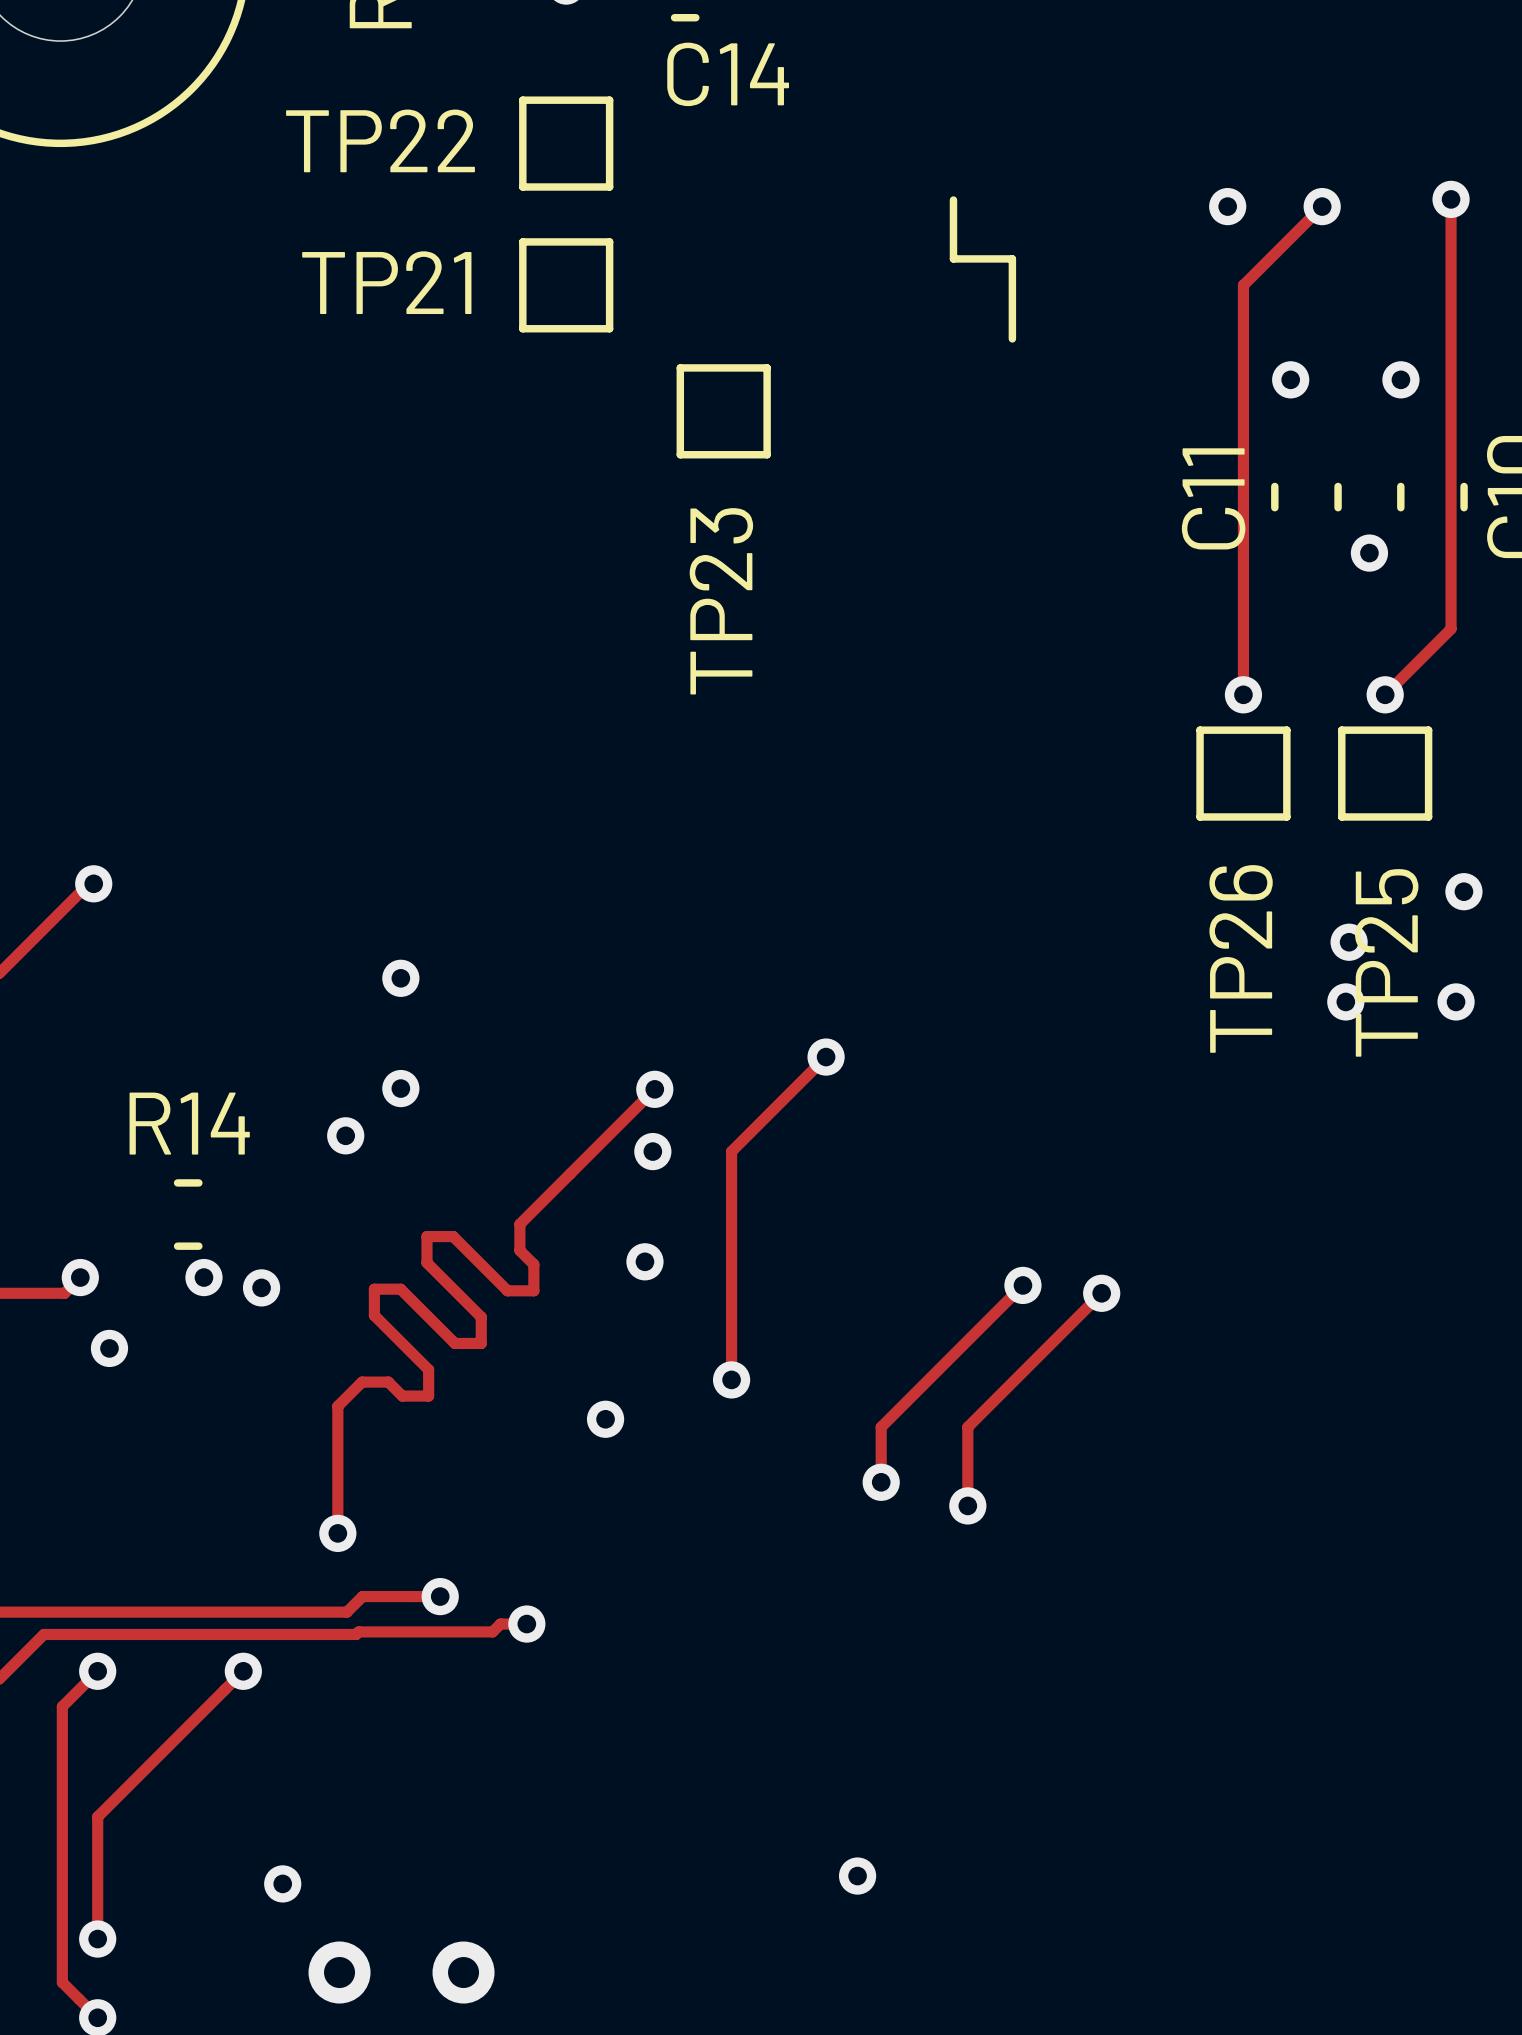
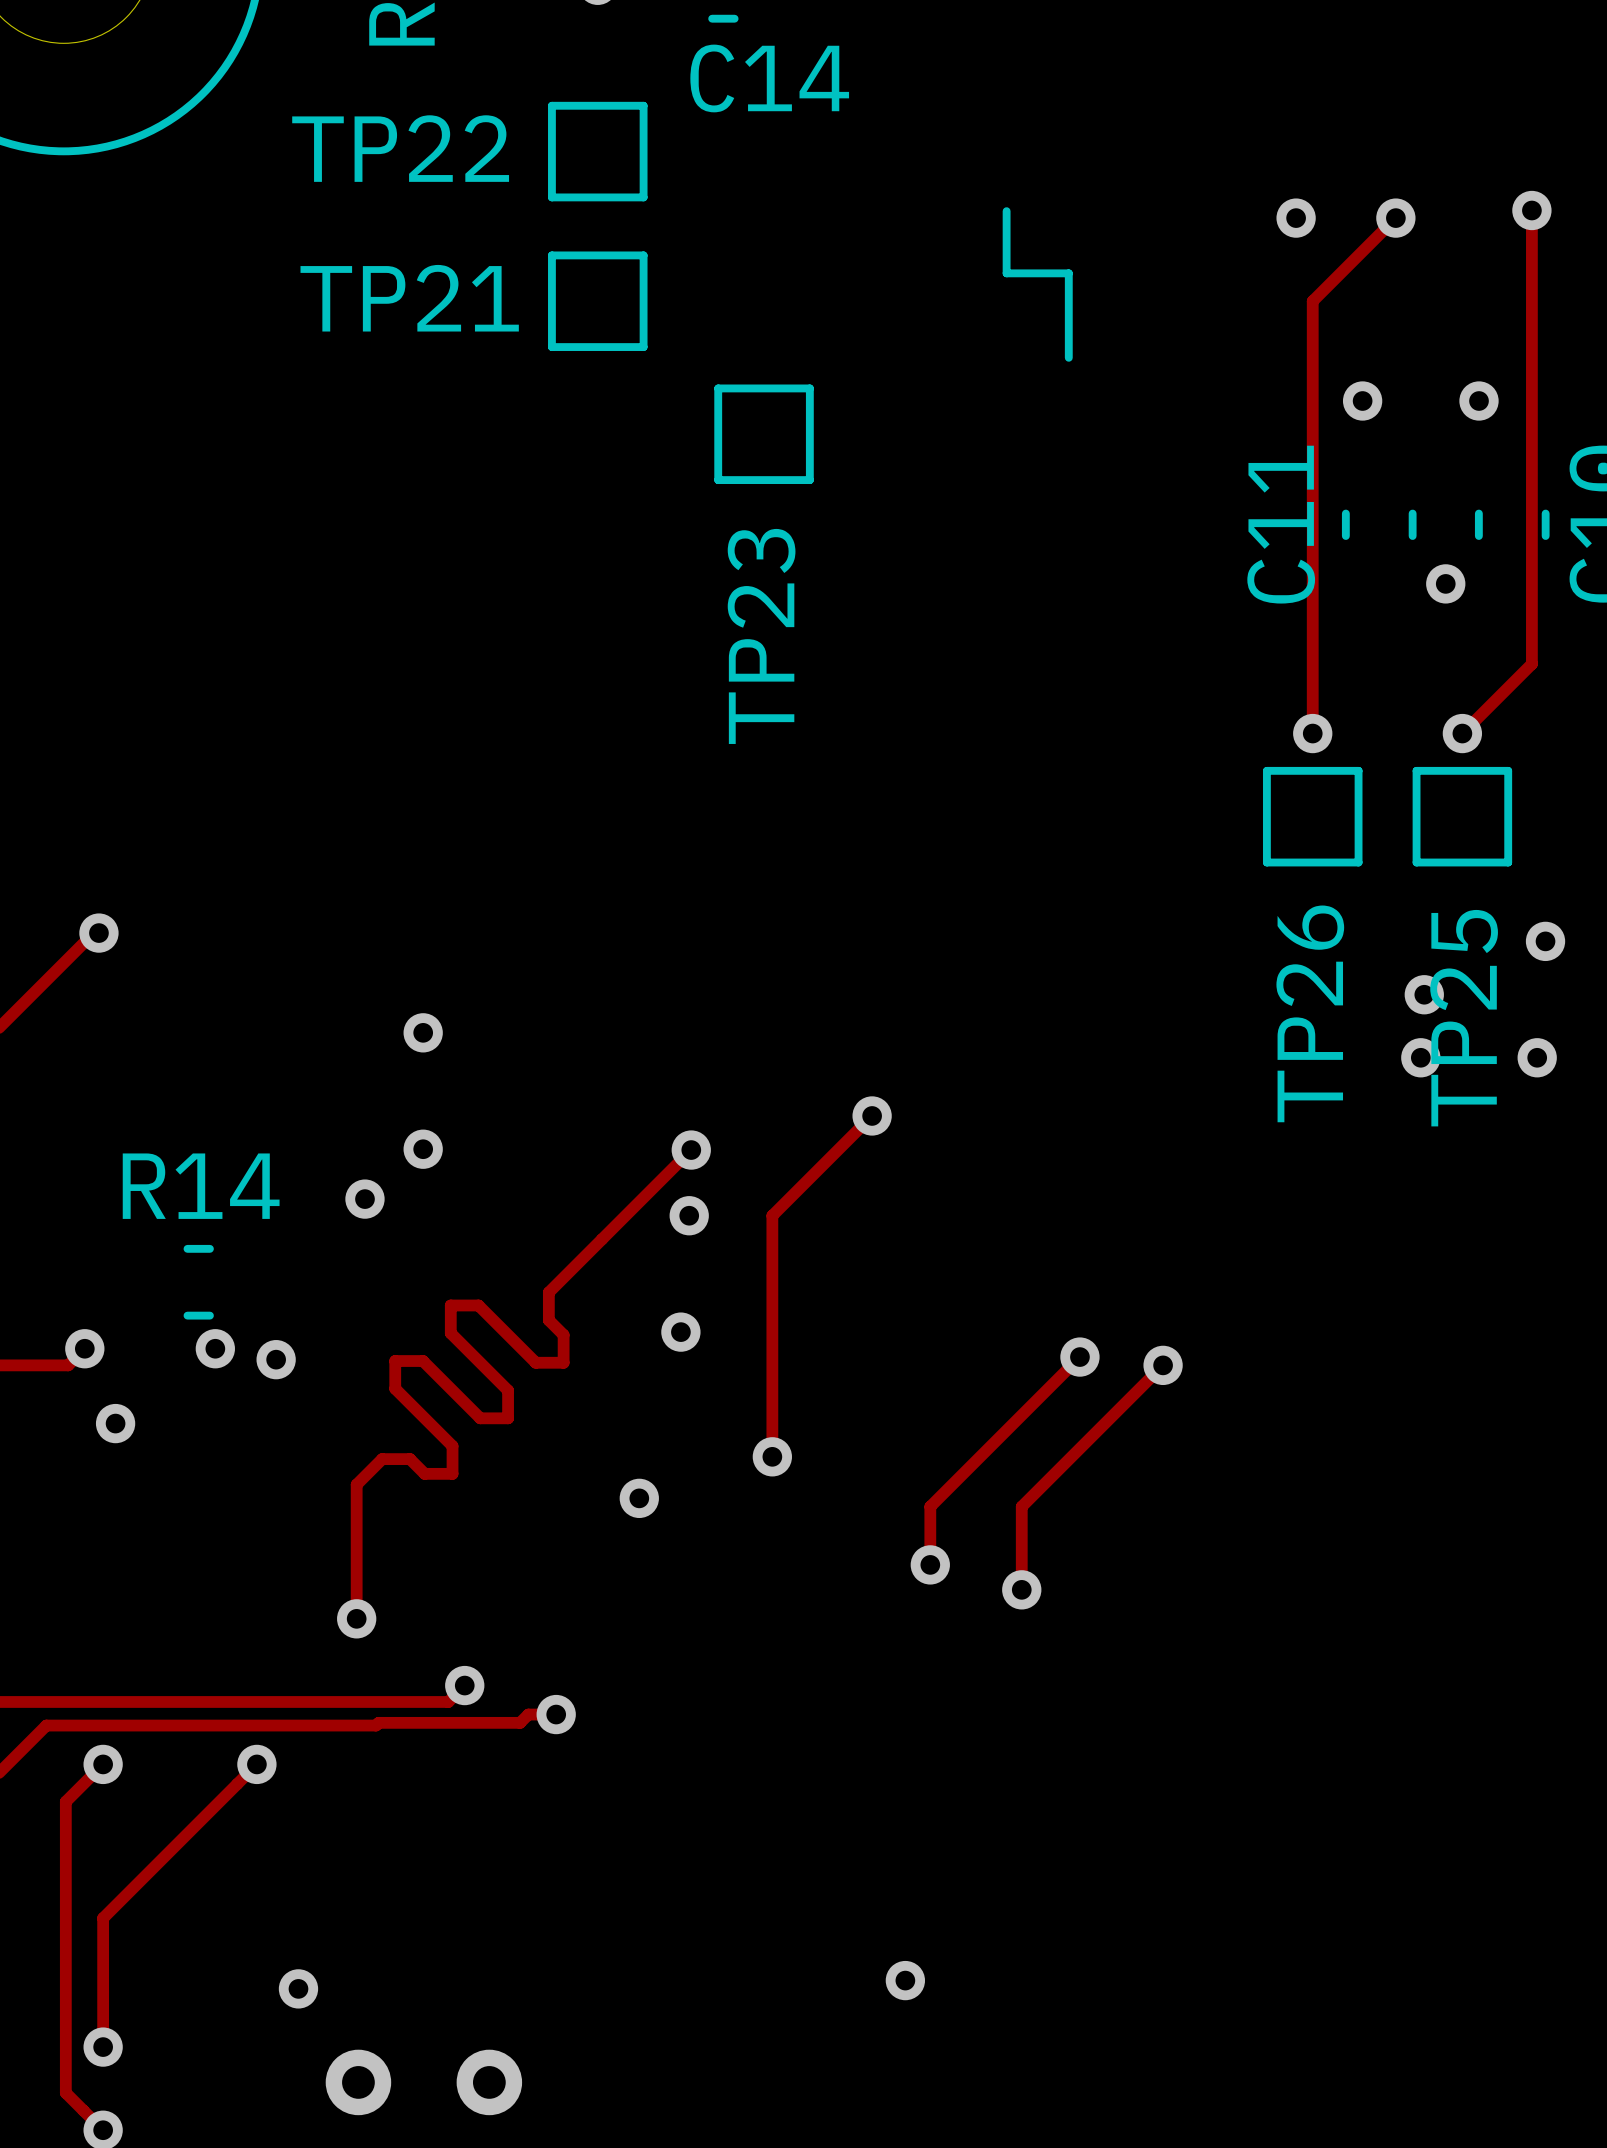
track: (440, 1596) (362, 1596) (346, 1612) -> (464, 1685) (448, 1701) (366, 1701)

